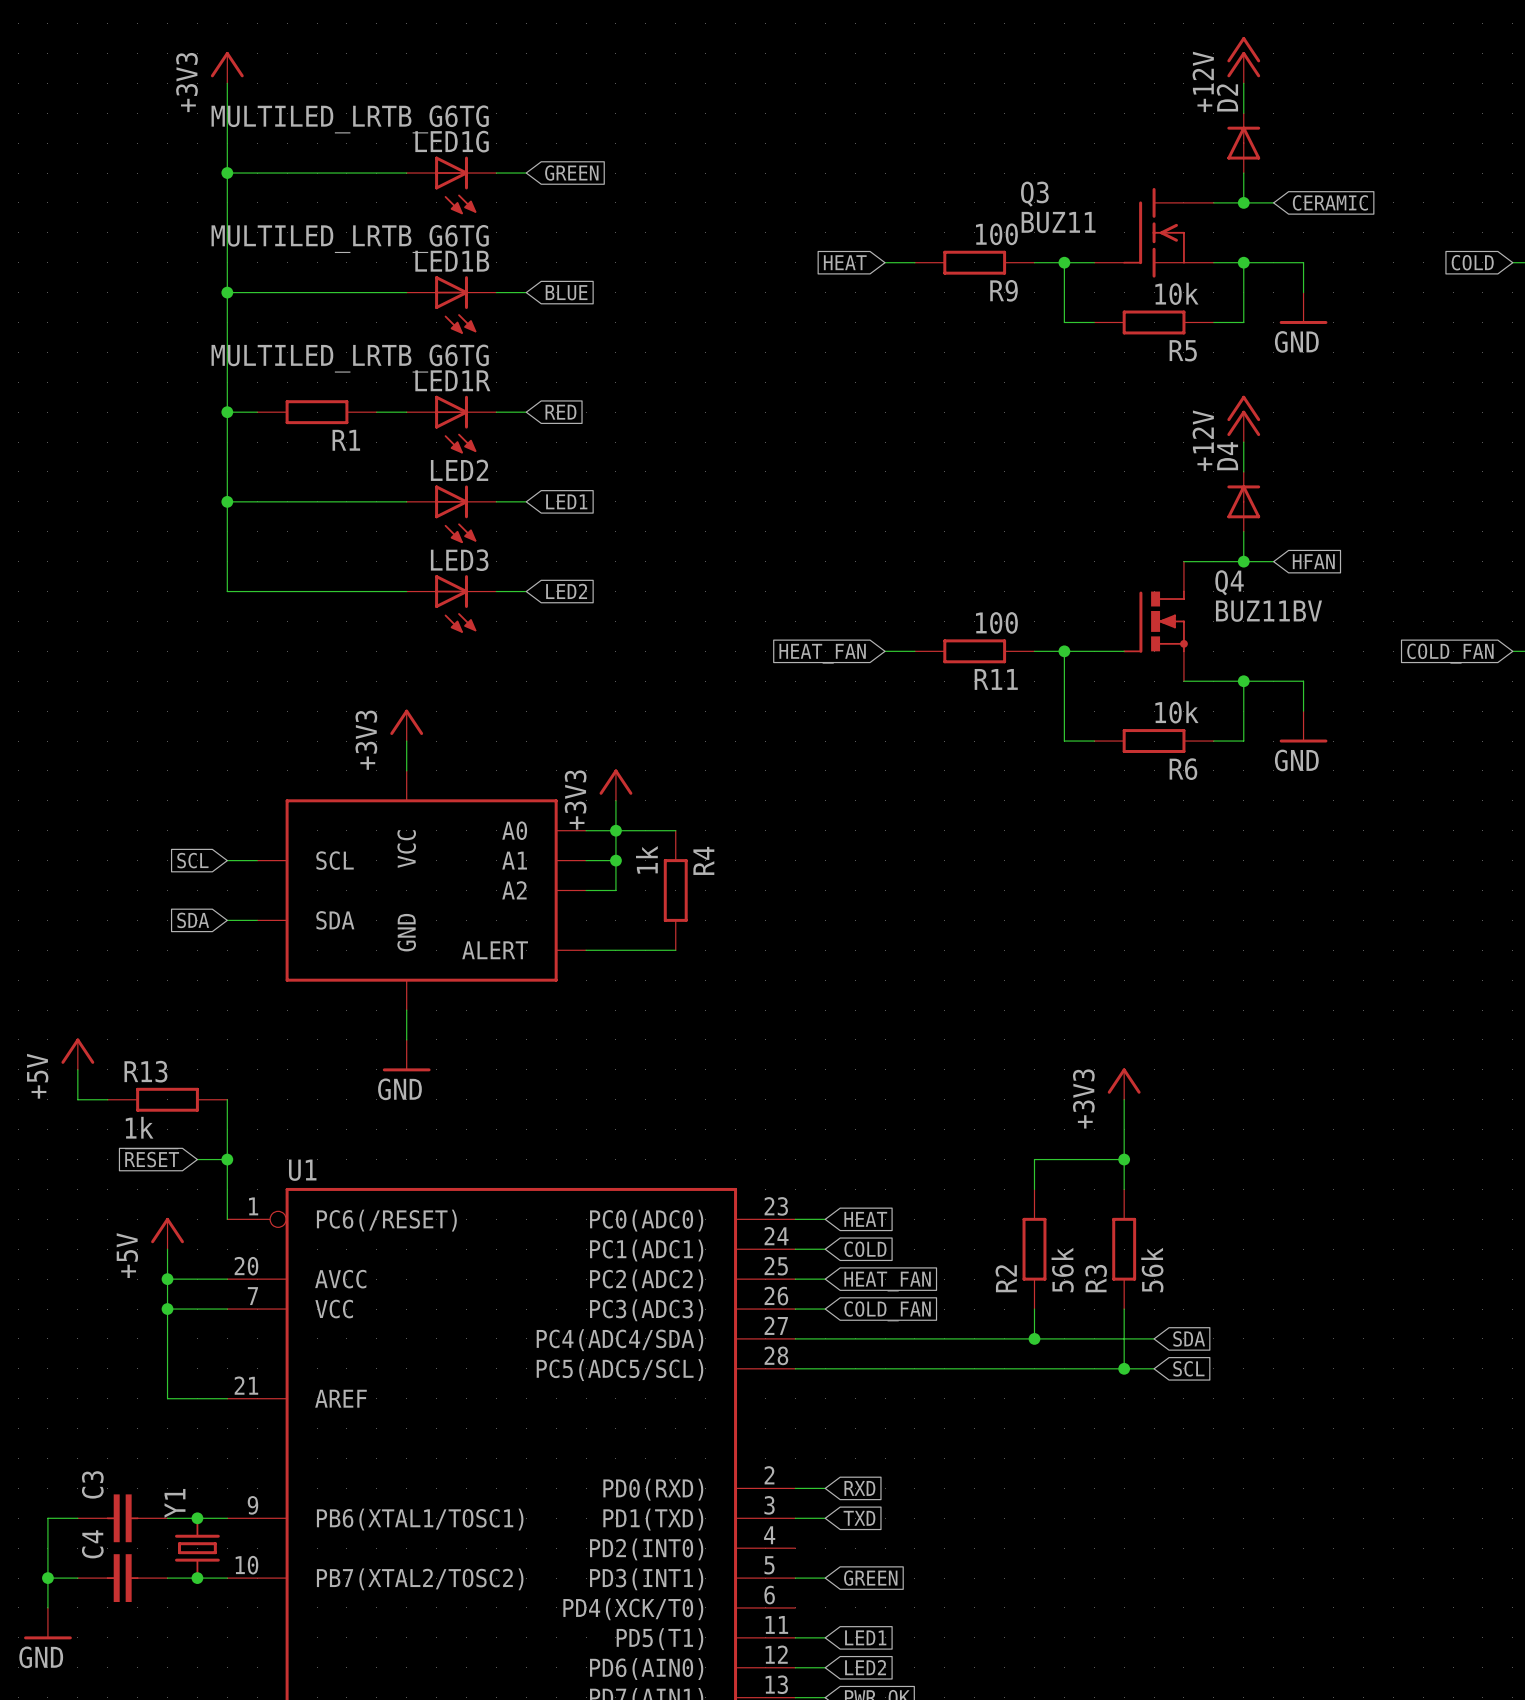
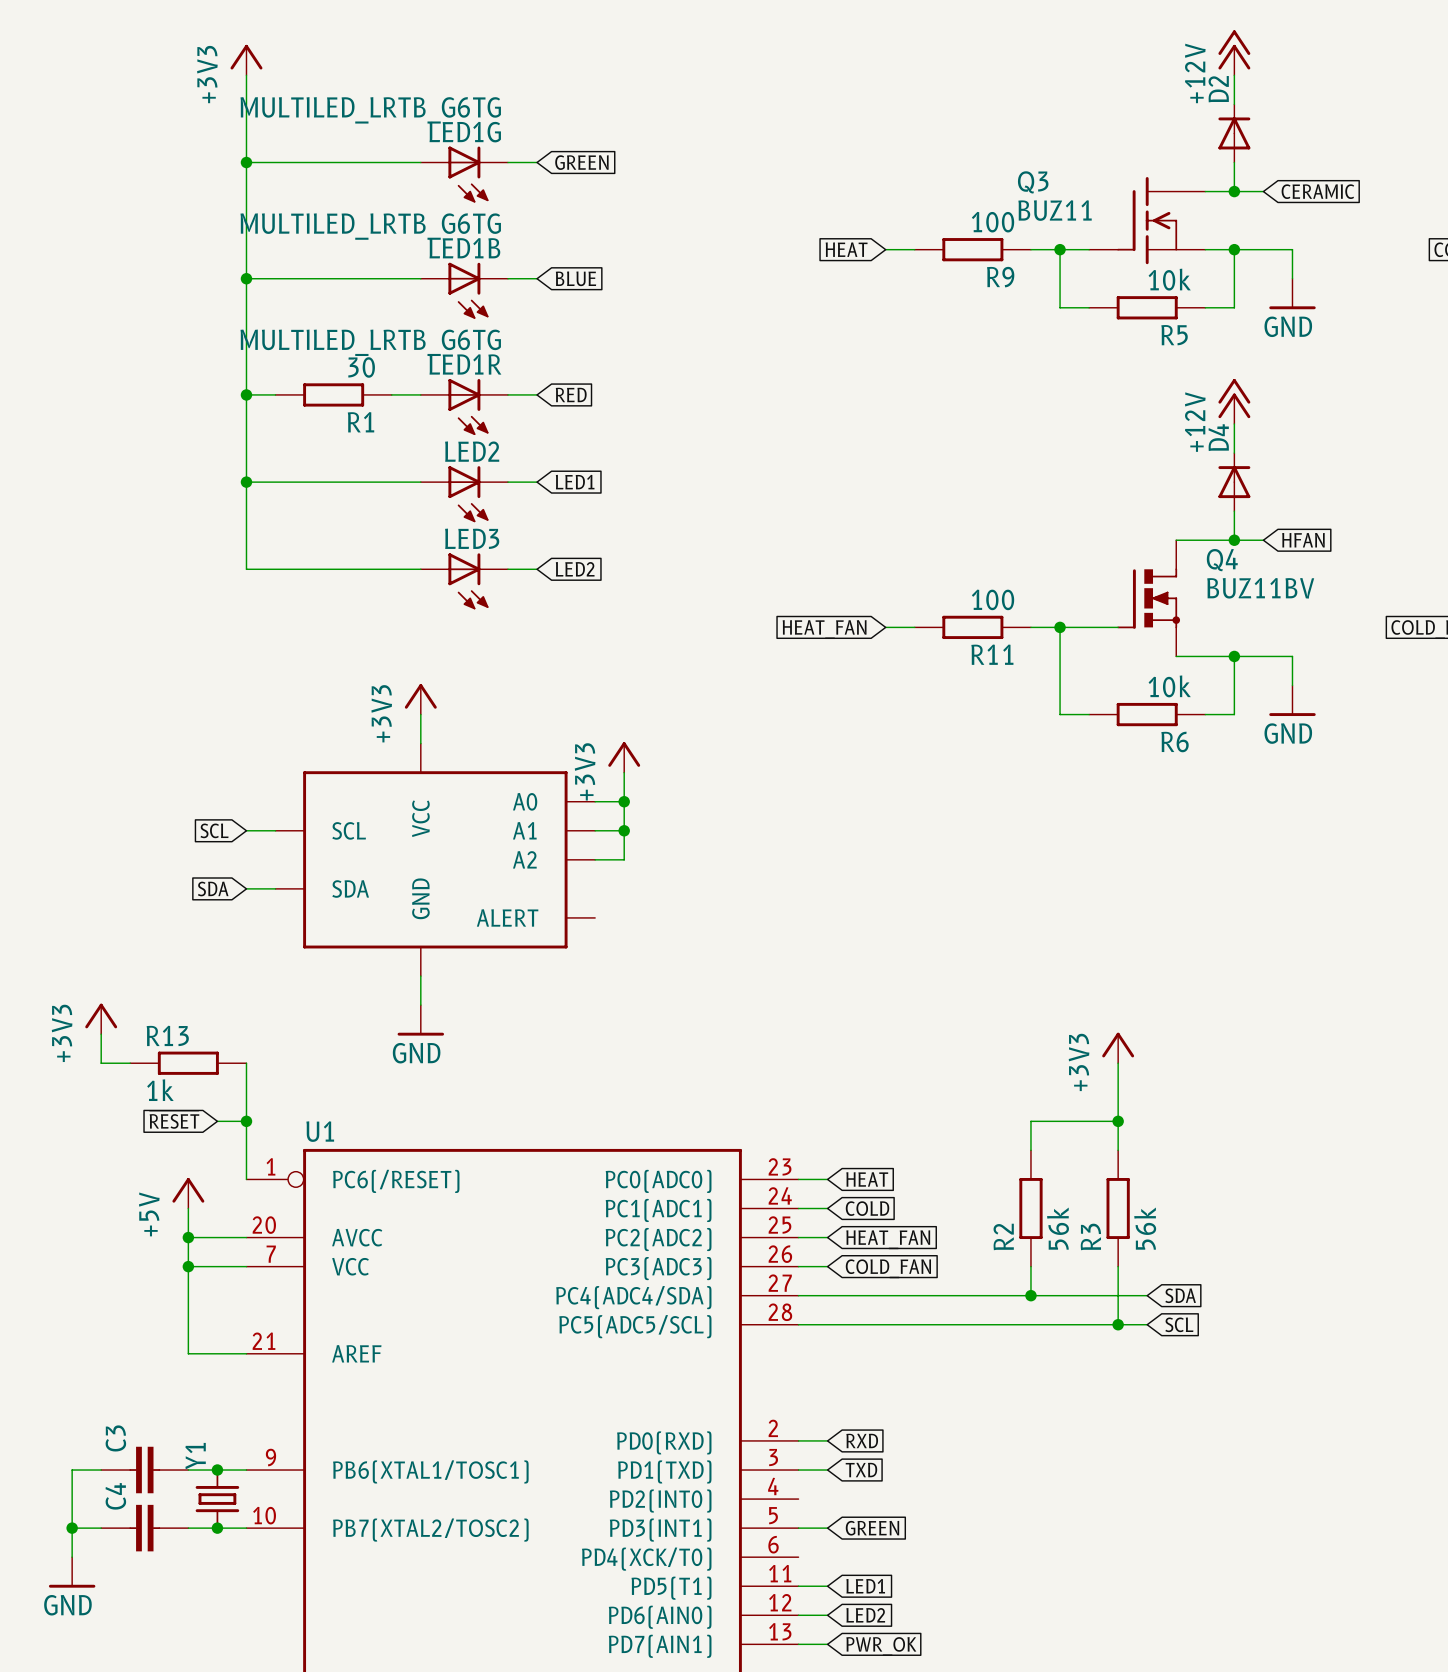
R1 value: none -> 30 (361, 367)
wire: (615, 830) (675, 830) -> none
R4: 1k (675, 890) -> none
wire: (586, 950) (675, 950) -> none
power symbol: +5V (77, 1054) -> +3V3 (101, 1018)

